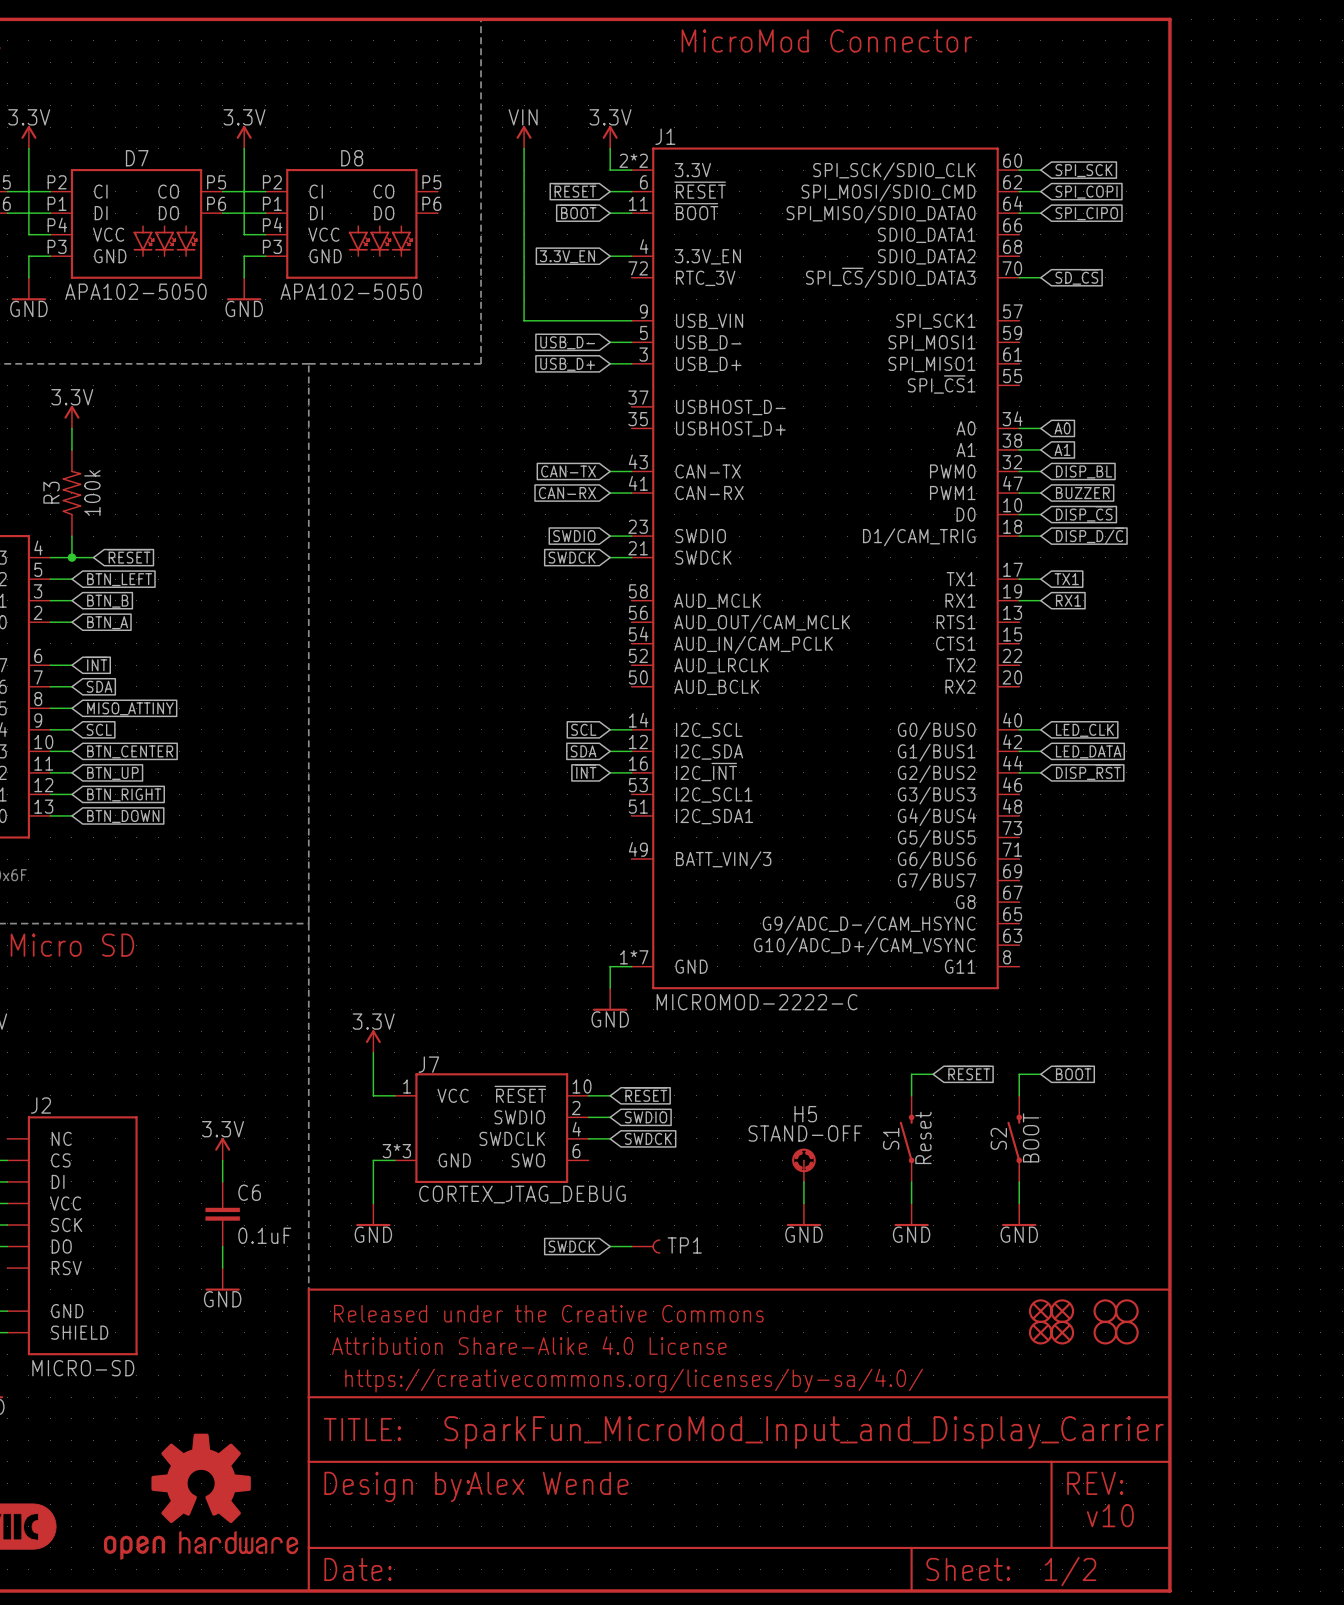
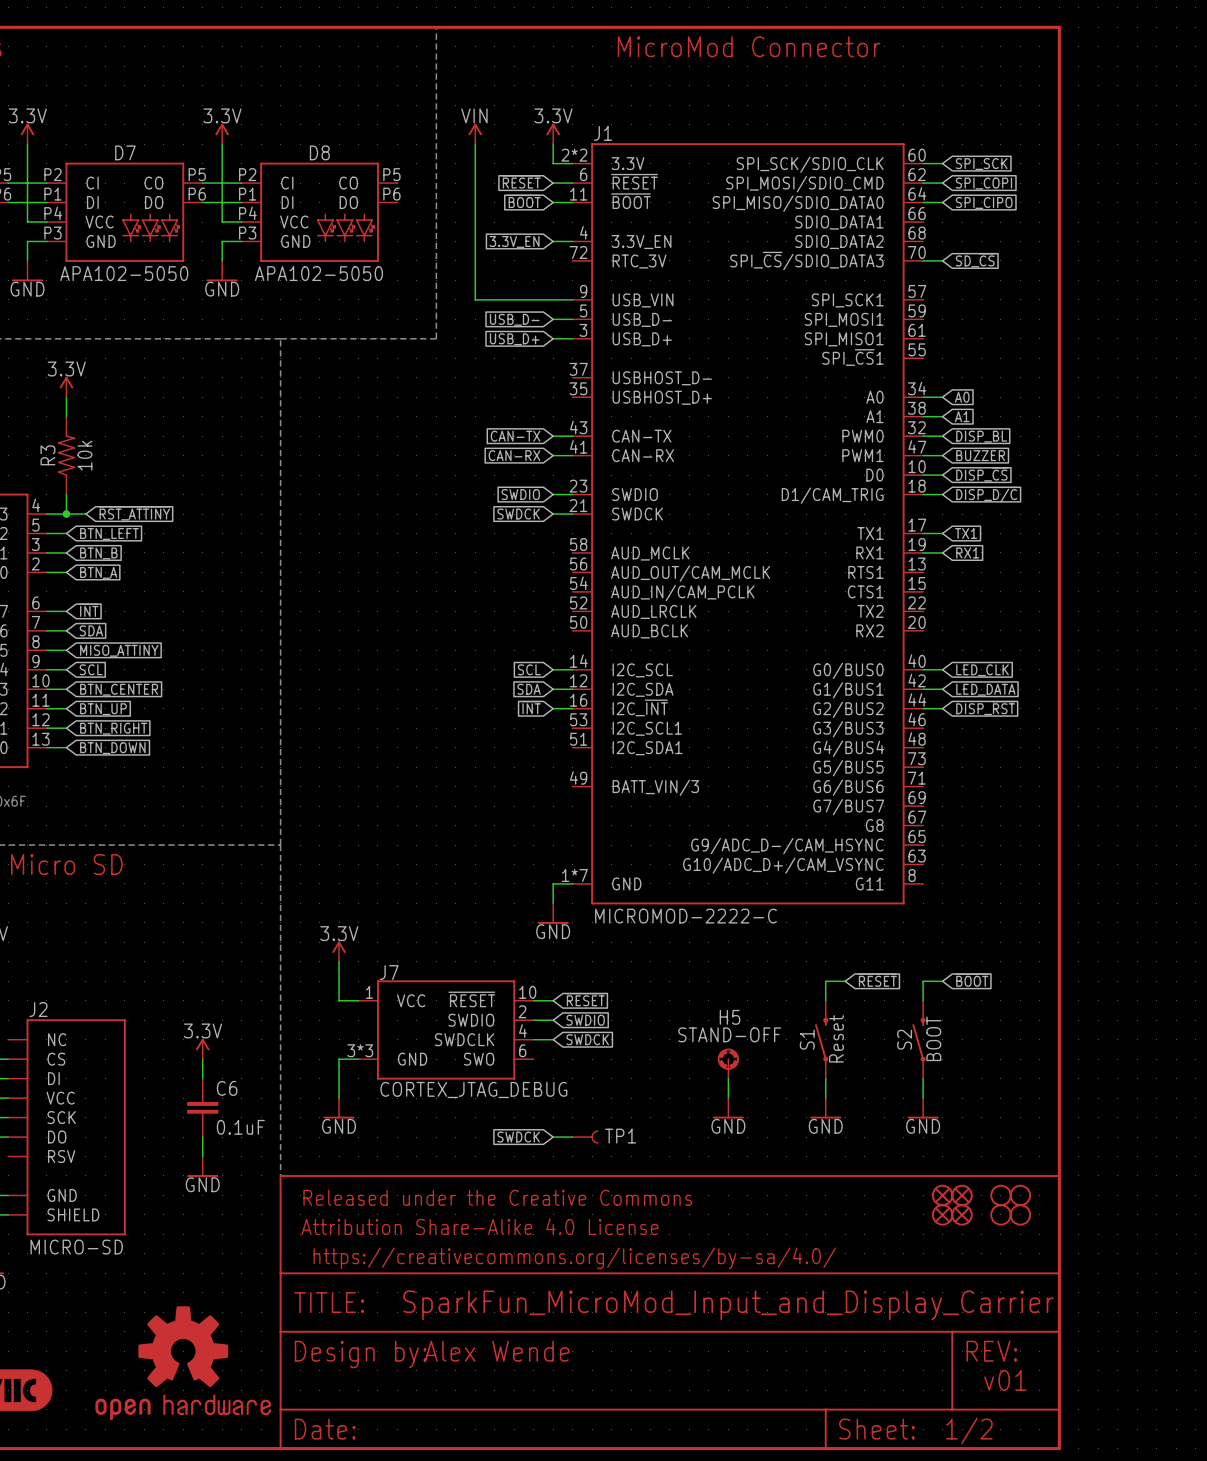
R3 value: 100k (92, 493) -> 10k (84, 455)
global label: ~{RESET} (128, 556) -> ~{RST_ATTINY} (134, 513)
text: v10 (1110, 1515) -> v01 (1005, 1380)

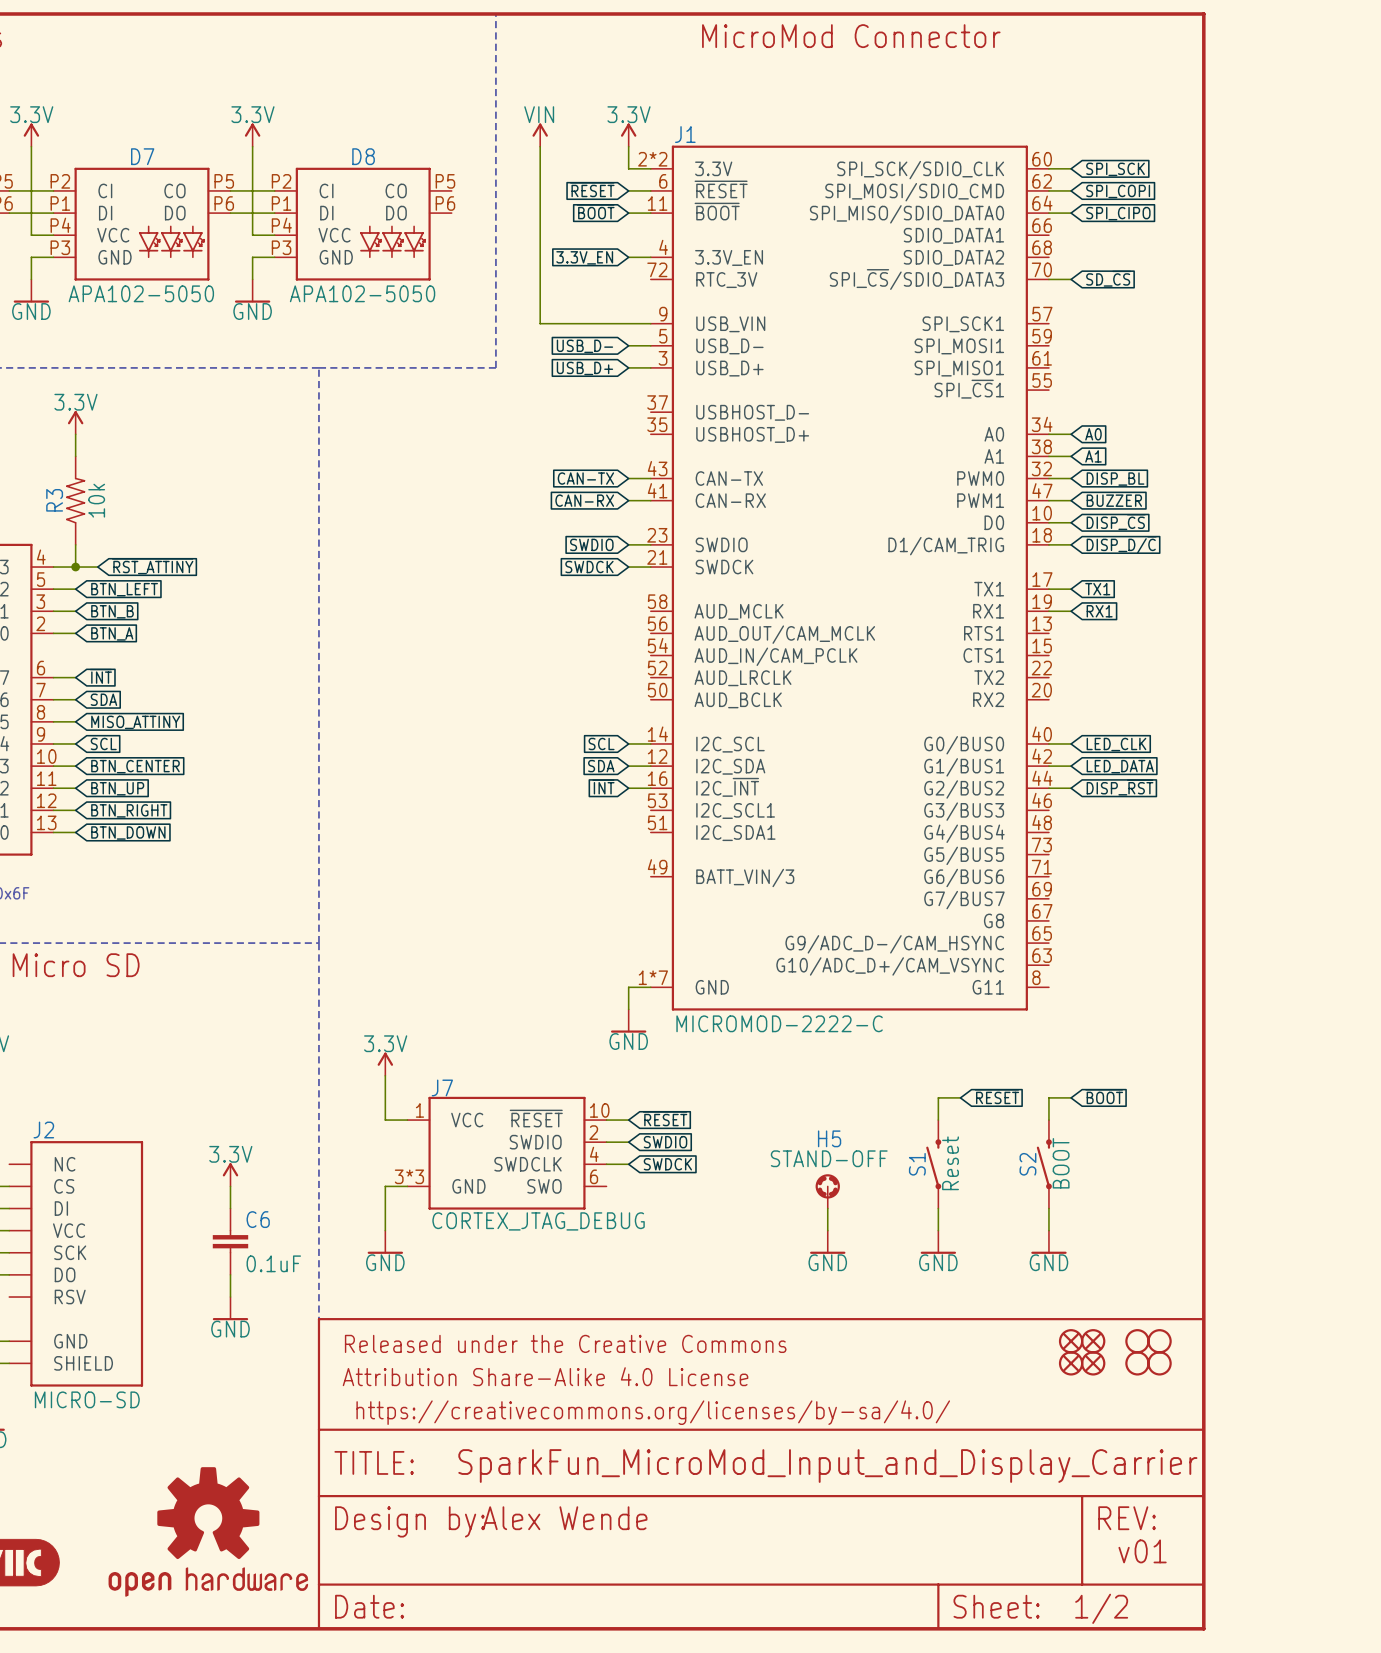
global label: SWDCK (518, 1137) -> none
wire: (553, 1137) (572, 1137) -> none
TP1: (585, 1137) -> none

